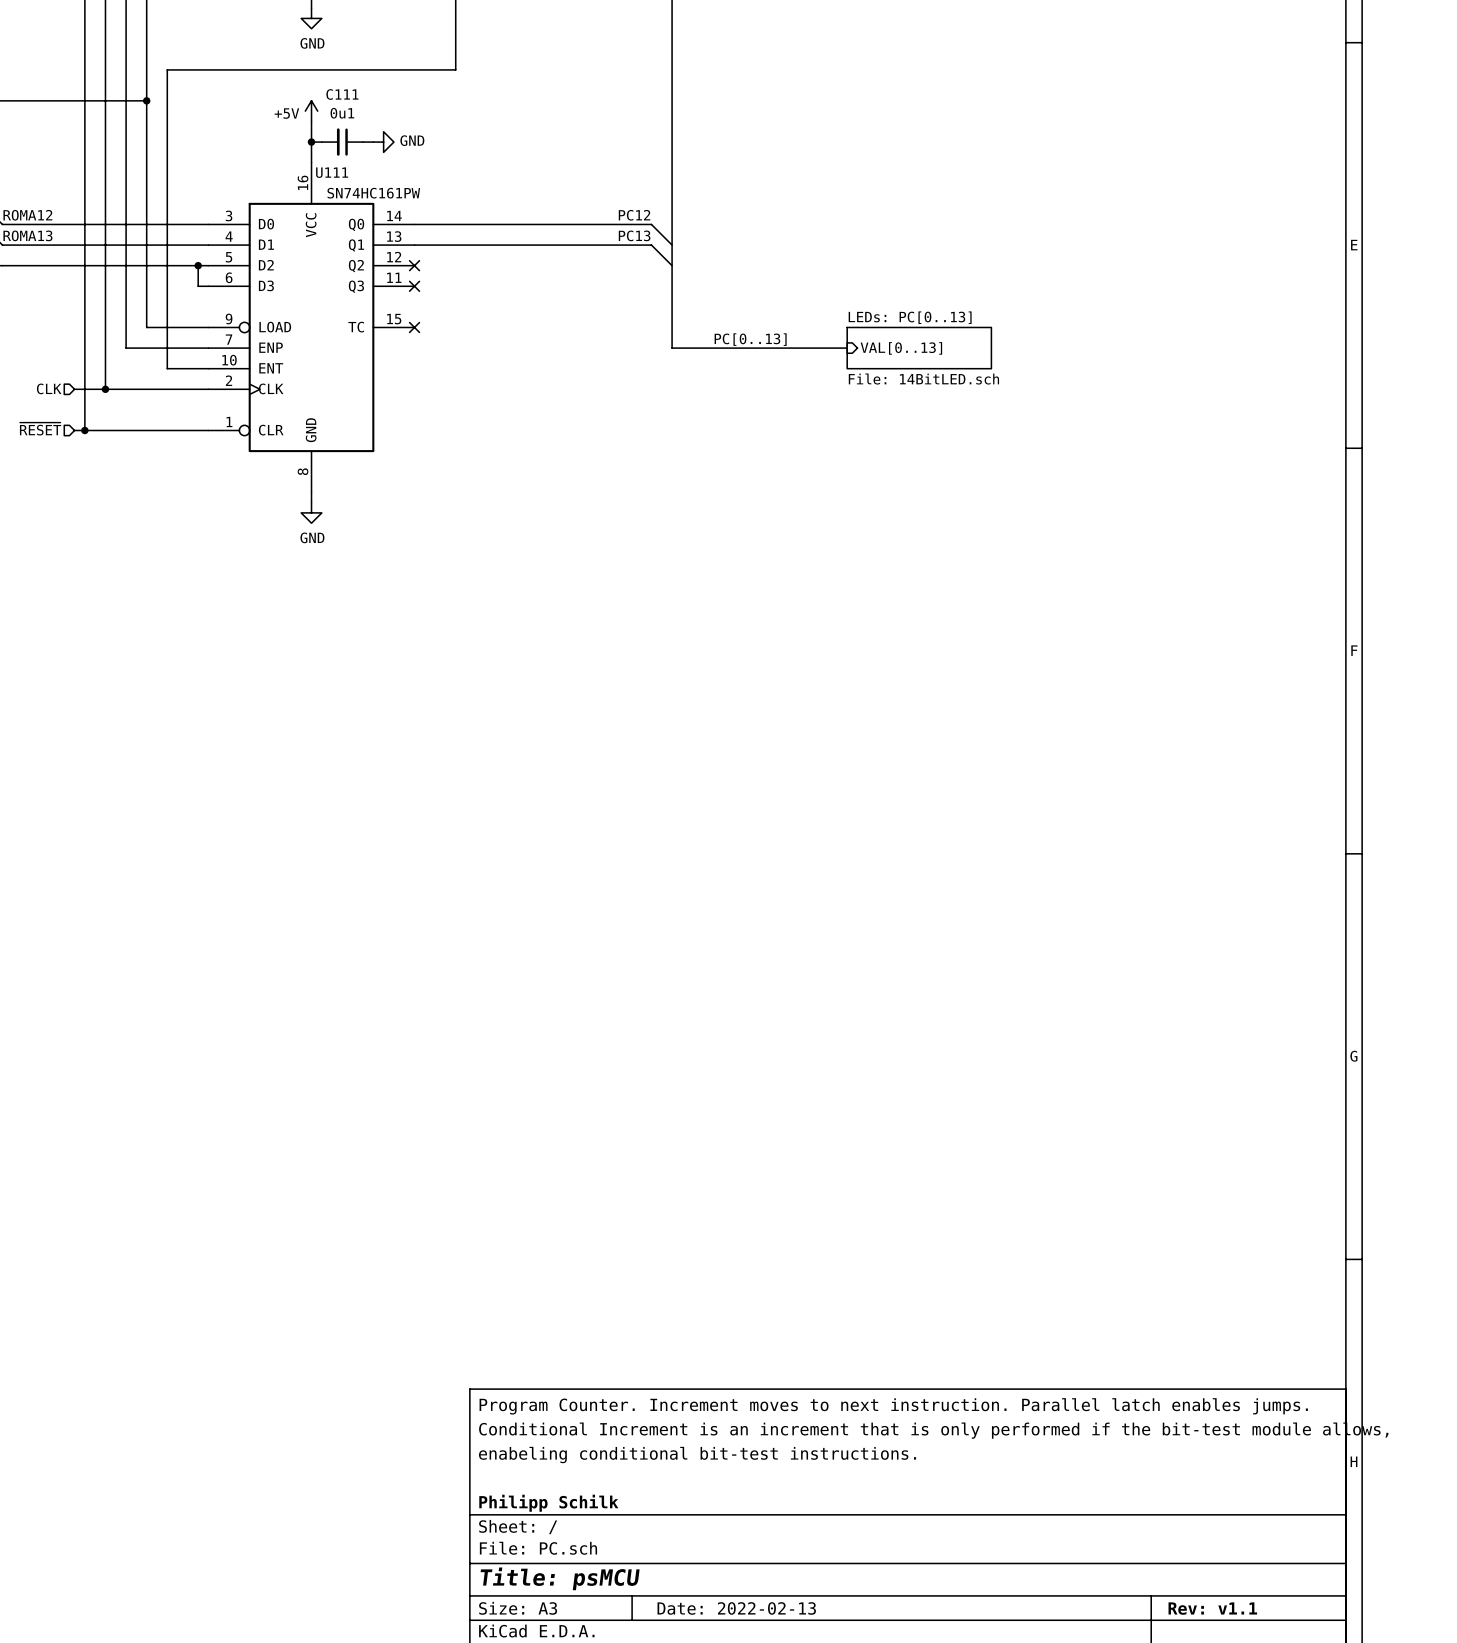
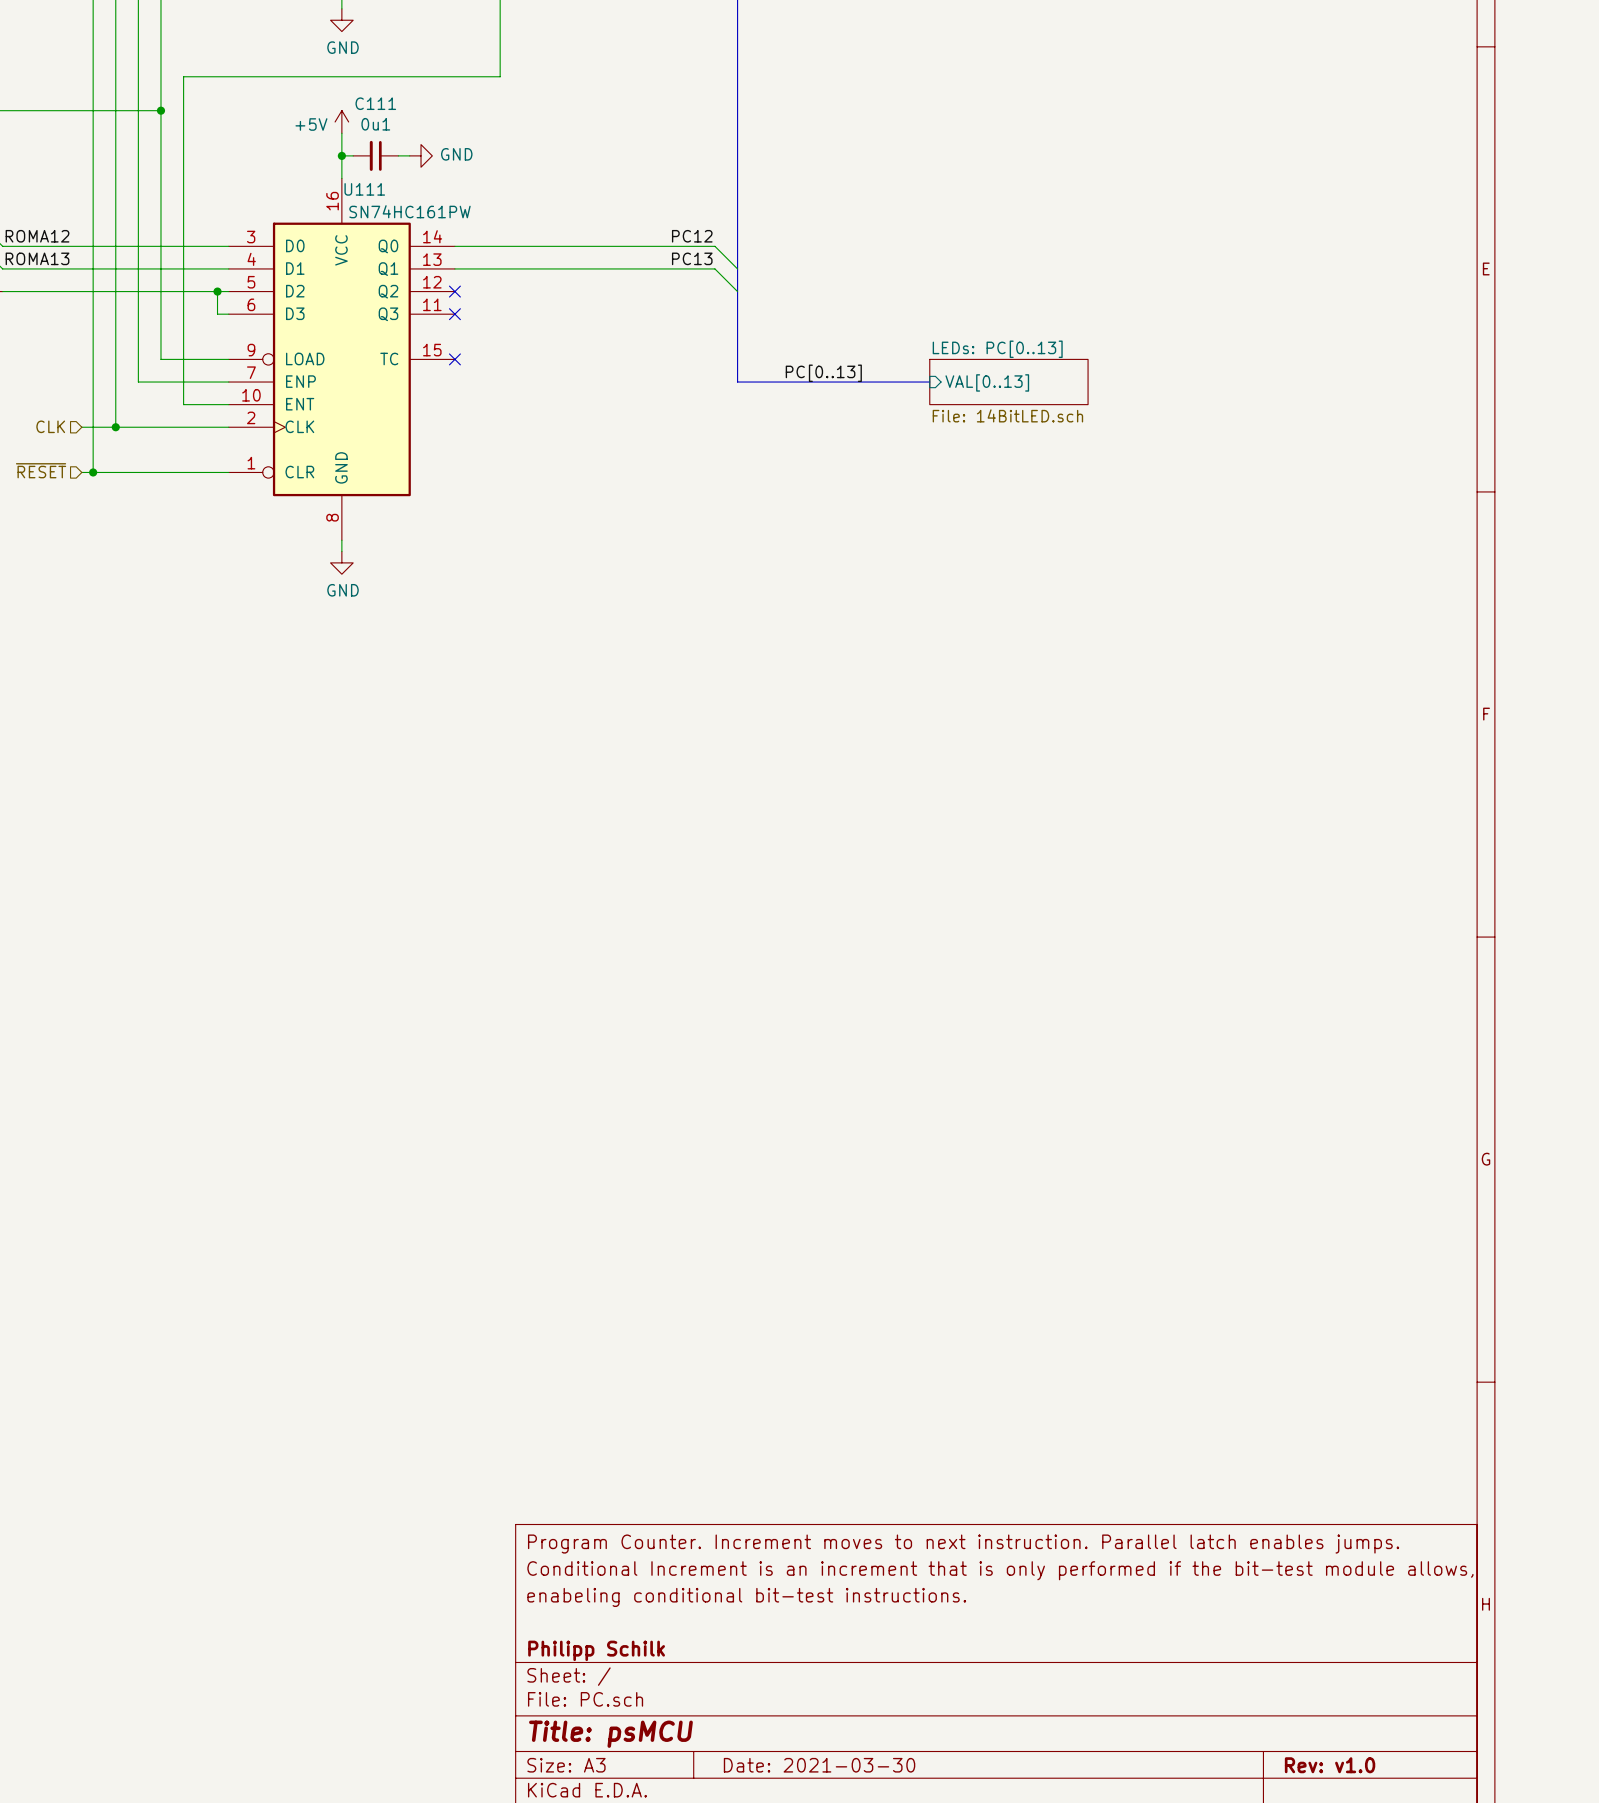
title block: Date: 2022-02-13 (736, 1608) -> Date: 2021-03-30 (819, 1765)
title block: Rev: v1.1 (1212, 1608) -> Rev: v1.0 (1330, 1765)

